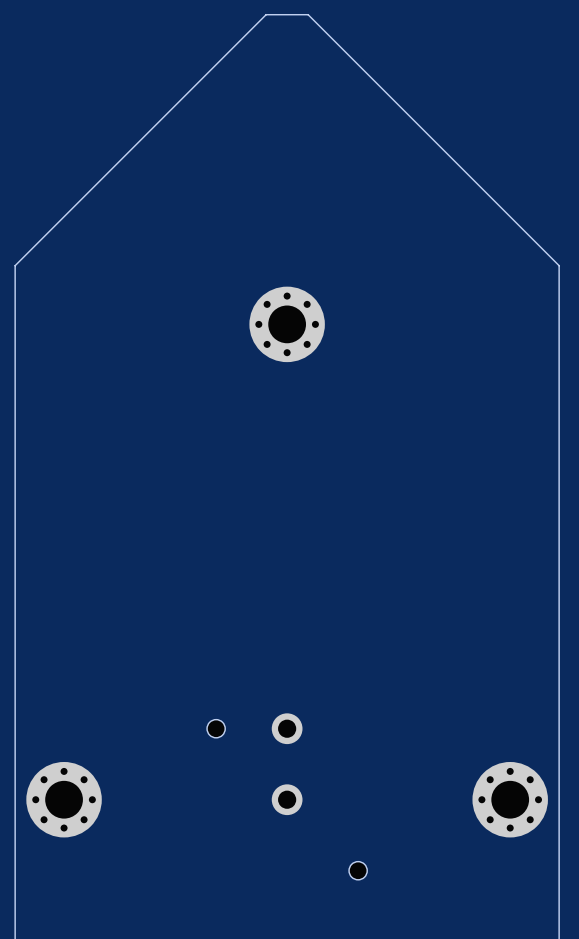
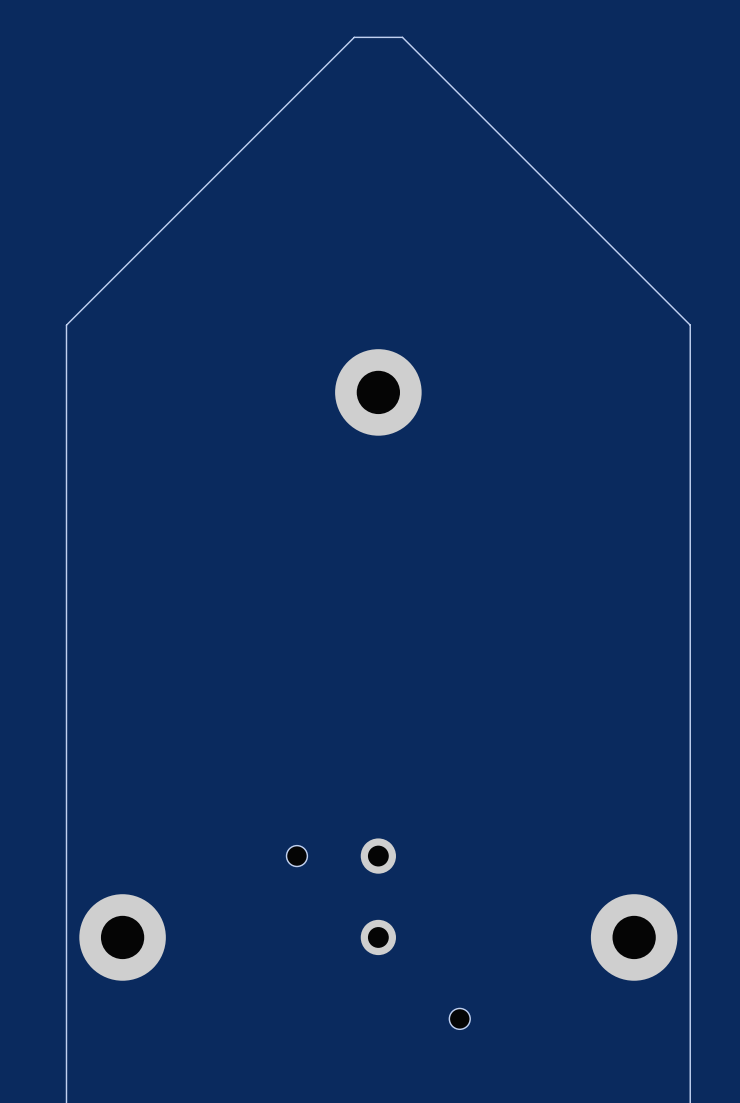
part footprint: [249, 286, 325, 363] -> [335, 349, 422, 436]
part footprint: [26, 761, 102, 838] -> [79, 894, 166, 981]
part footprint: [472, 761, 548, 838] -> [590, 894, 678, 981]

